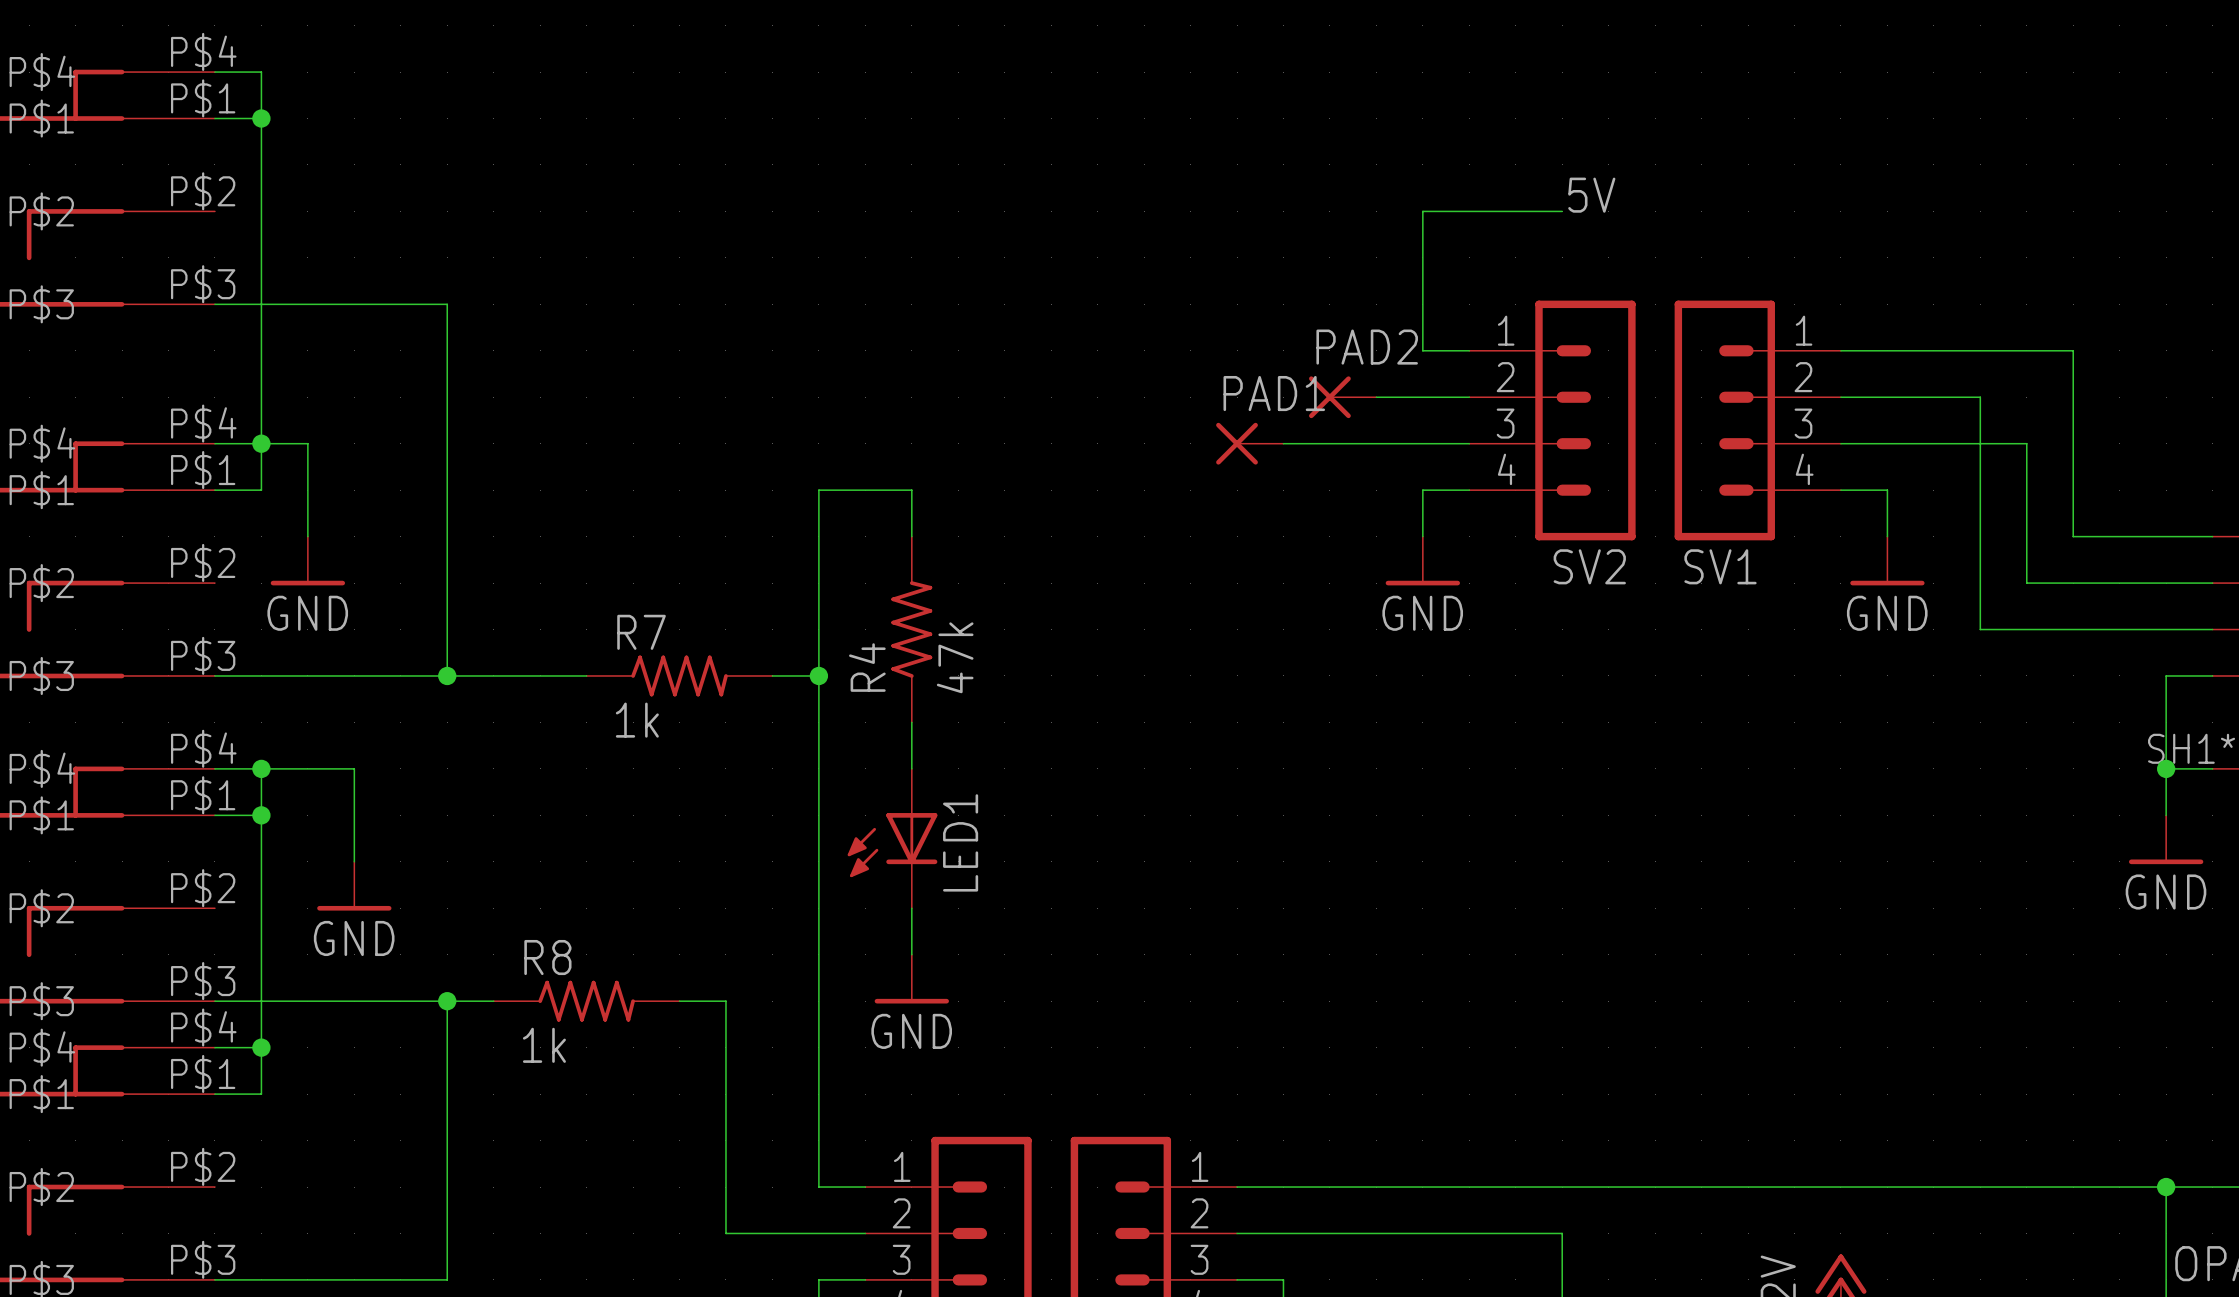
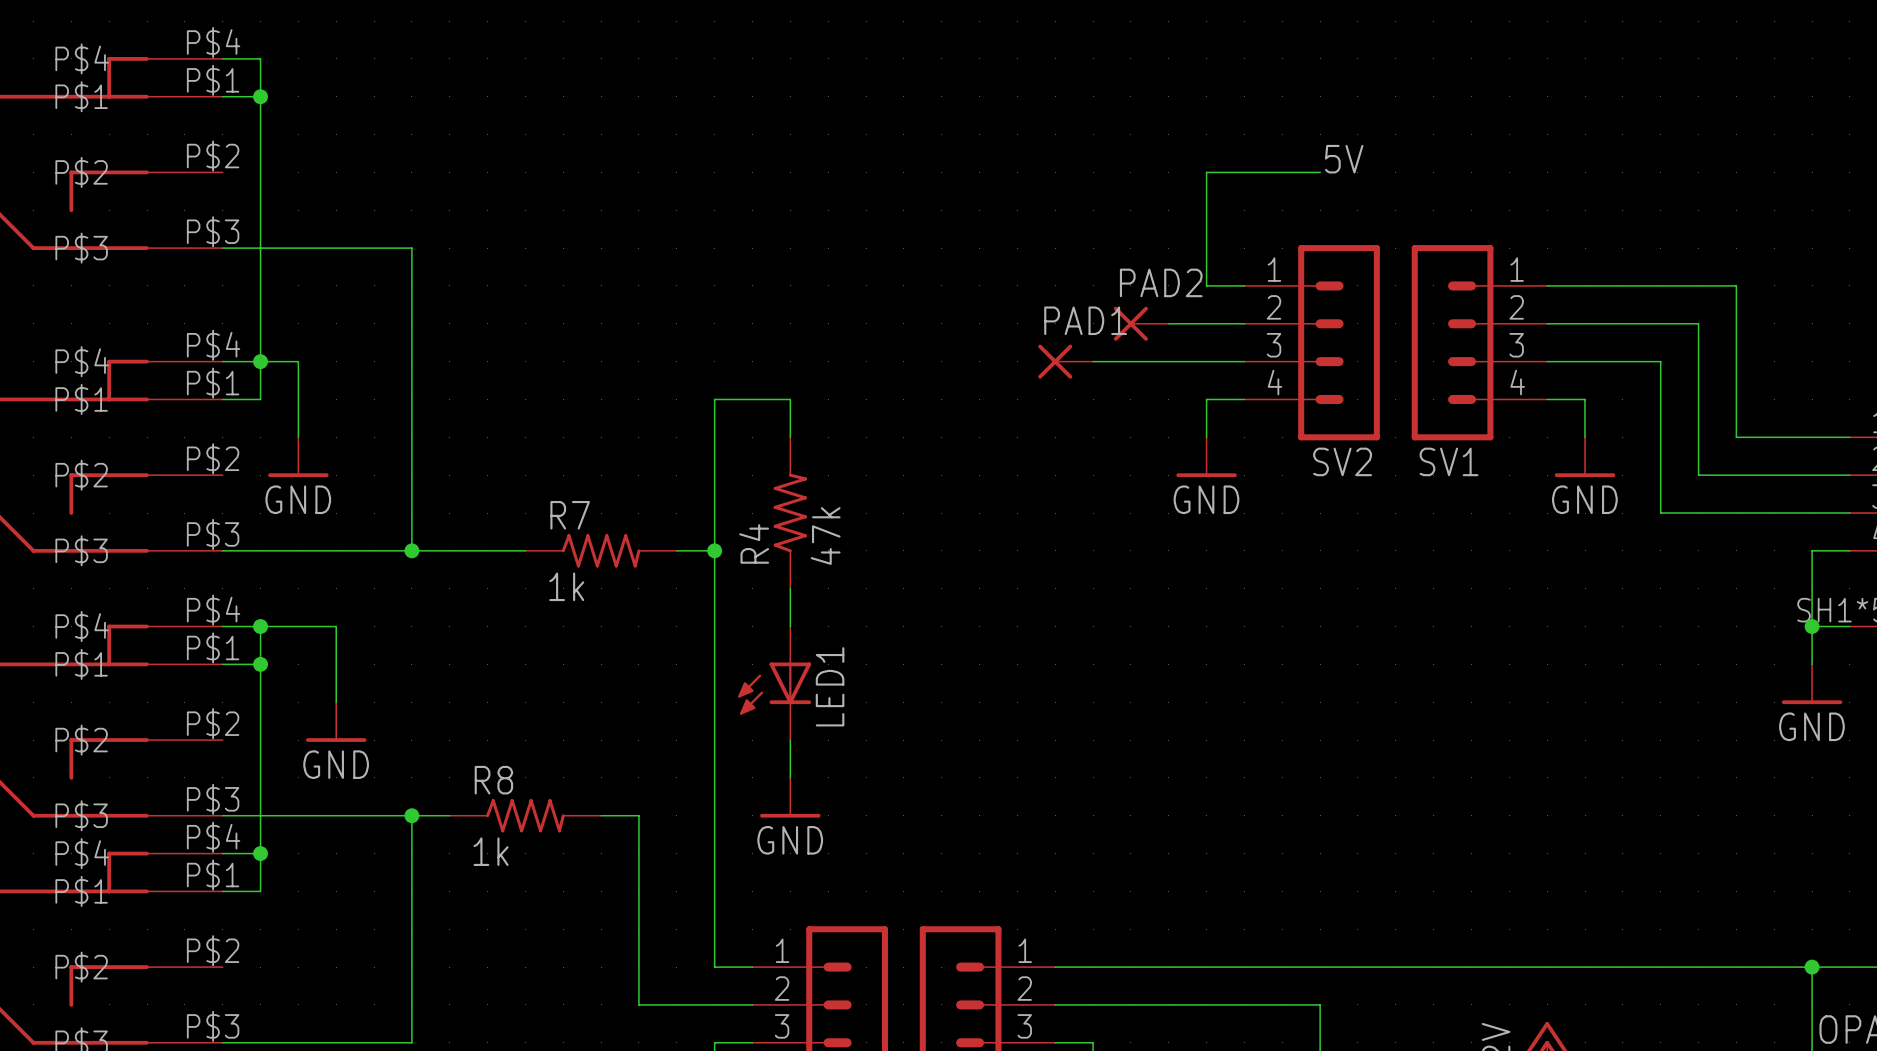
wire: (1980, 397) (1980, 443) (2026, 443) -> (1660, 323) (1698, 323) (1698, 361)

